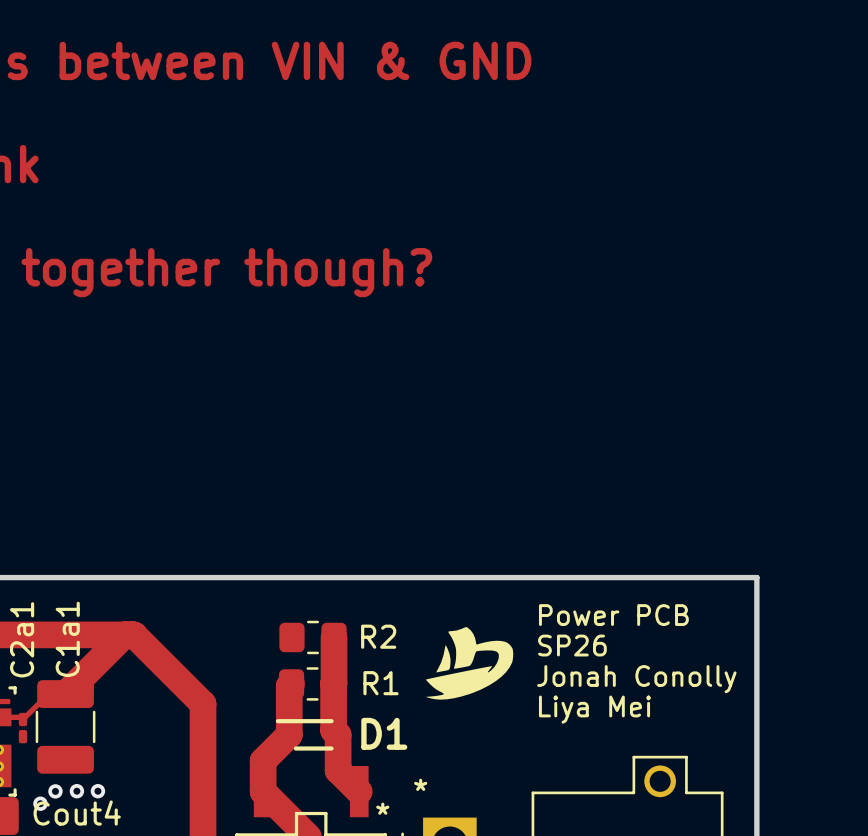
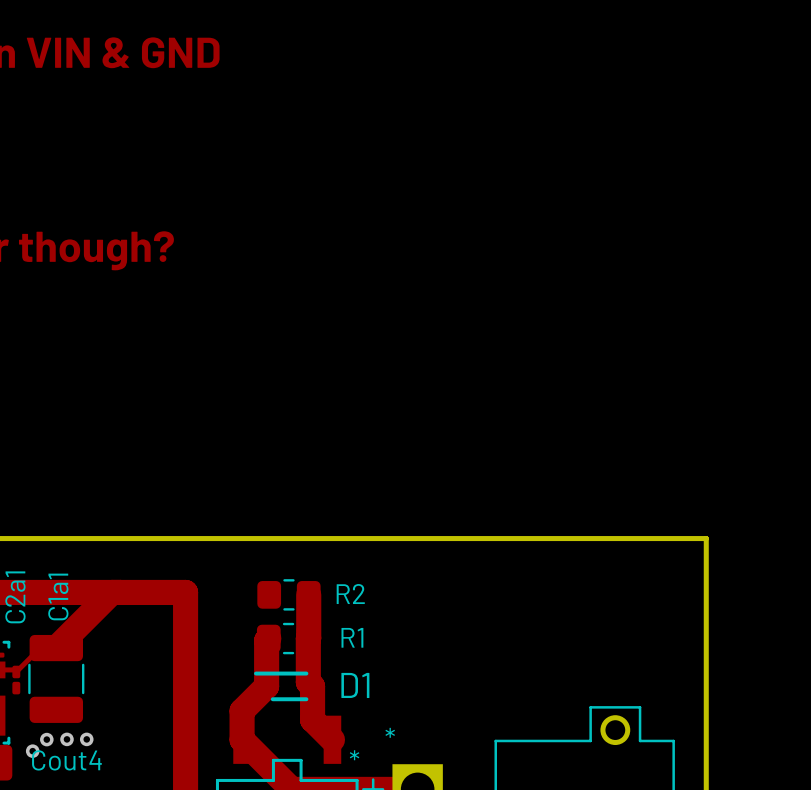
text: Power PCB (613, 615) -> none
drawing: [425, 627, 514, 700] -> none
top track: (134, 634) (203, 703) -> (120, 592) (185, 592) (185, 657)
text: SP26 (572, 645) -> none
text: Jonah Conolly (636, 679) -> none
text: Liya Mei (594, 709) -> none

